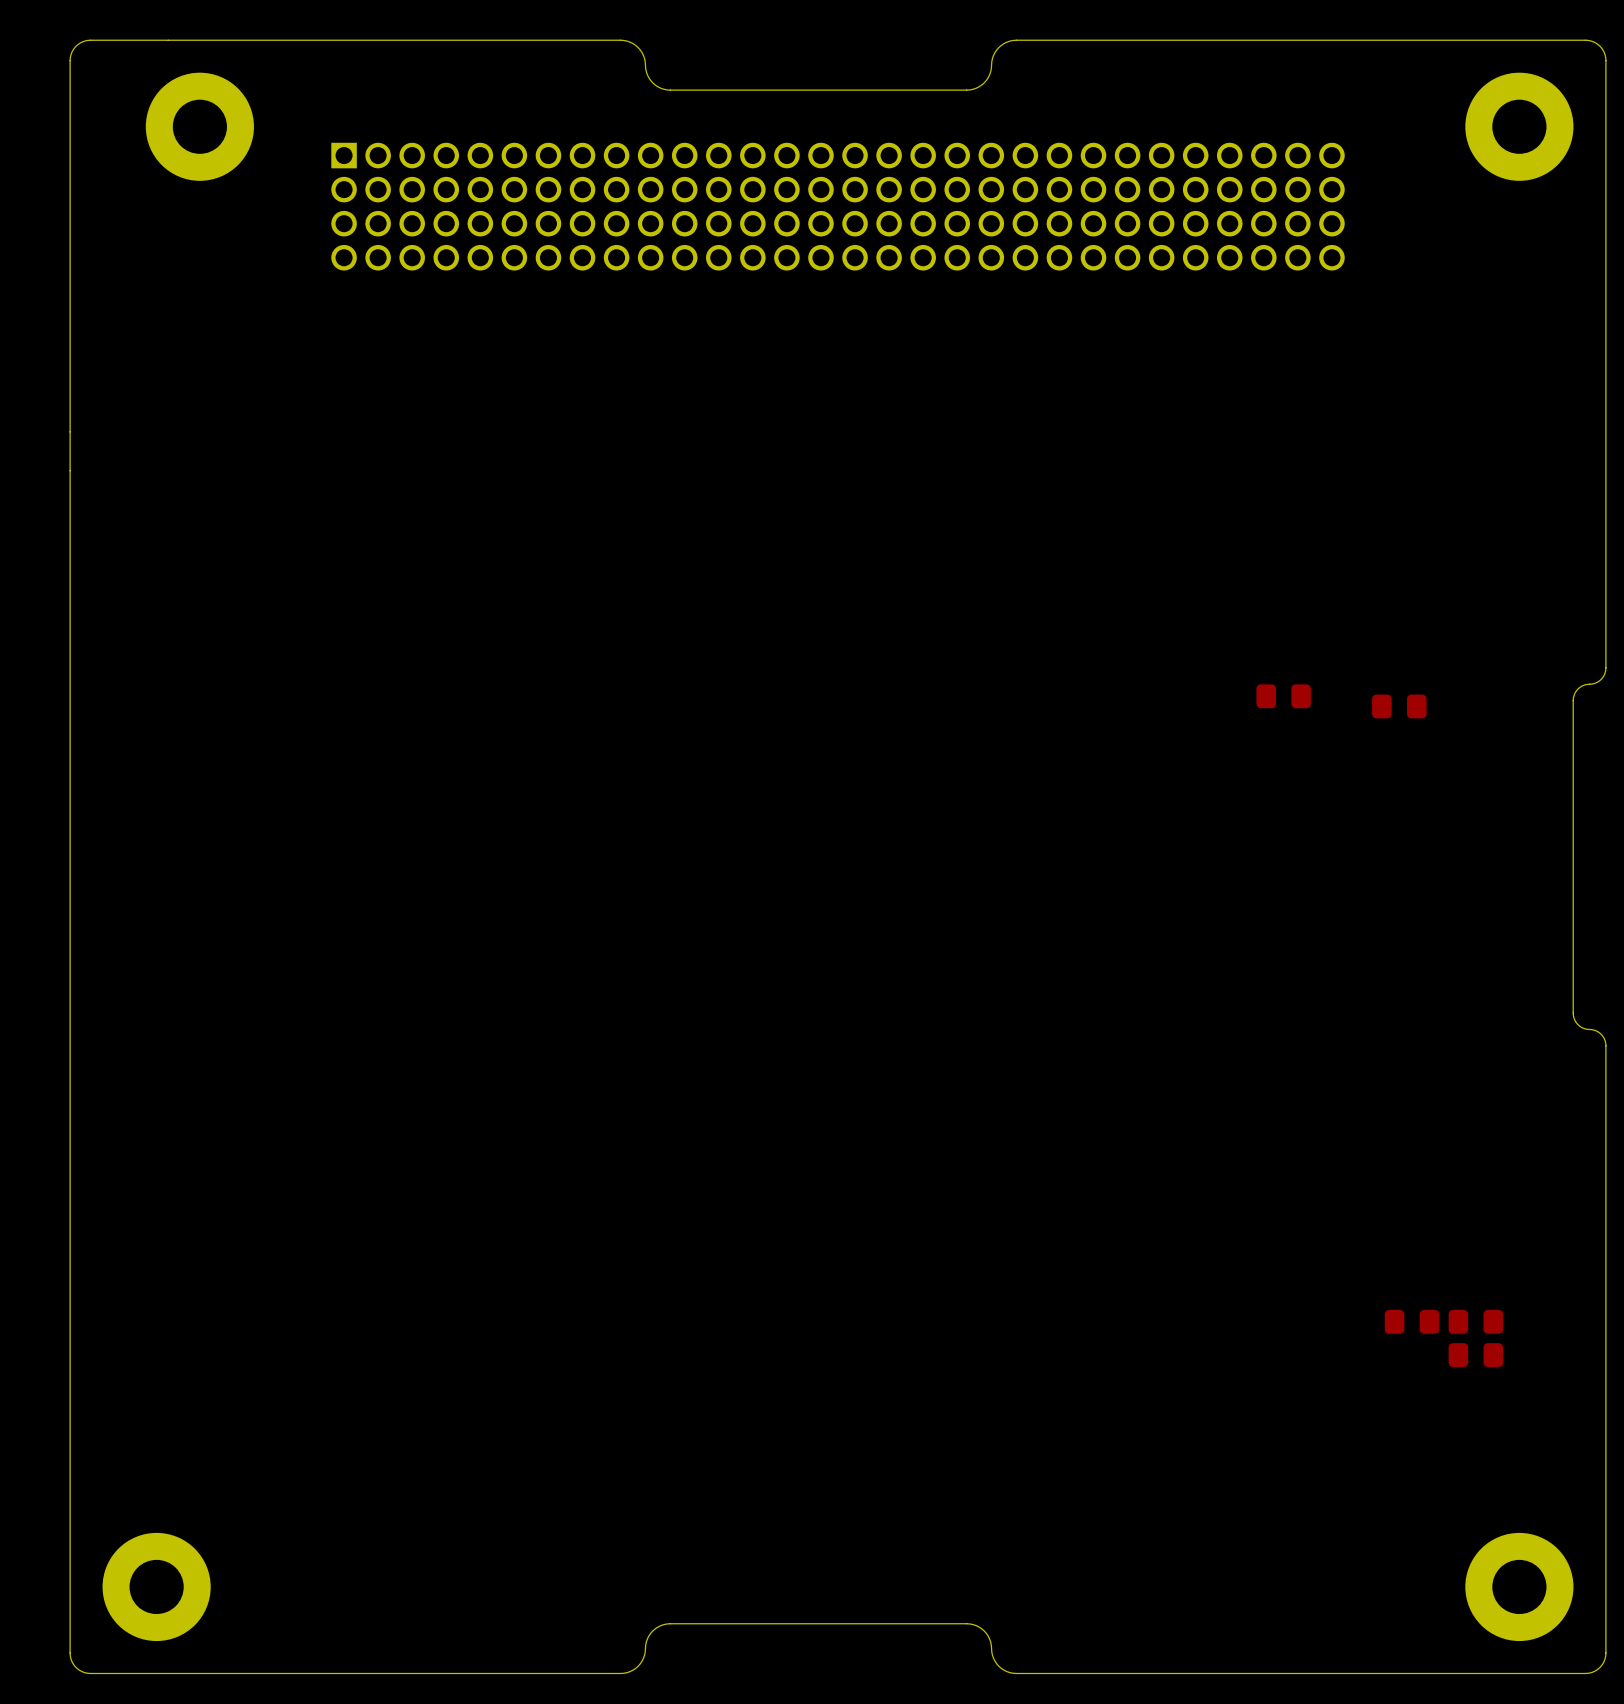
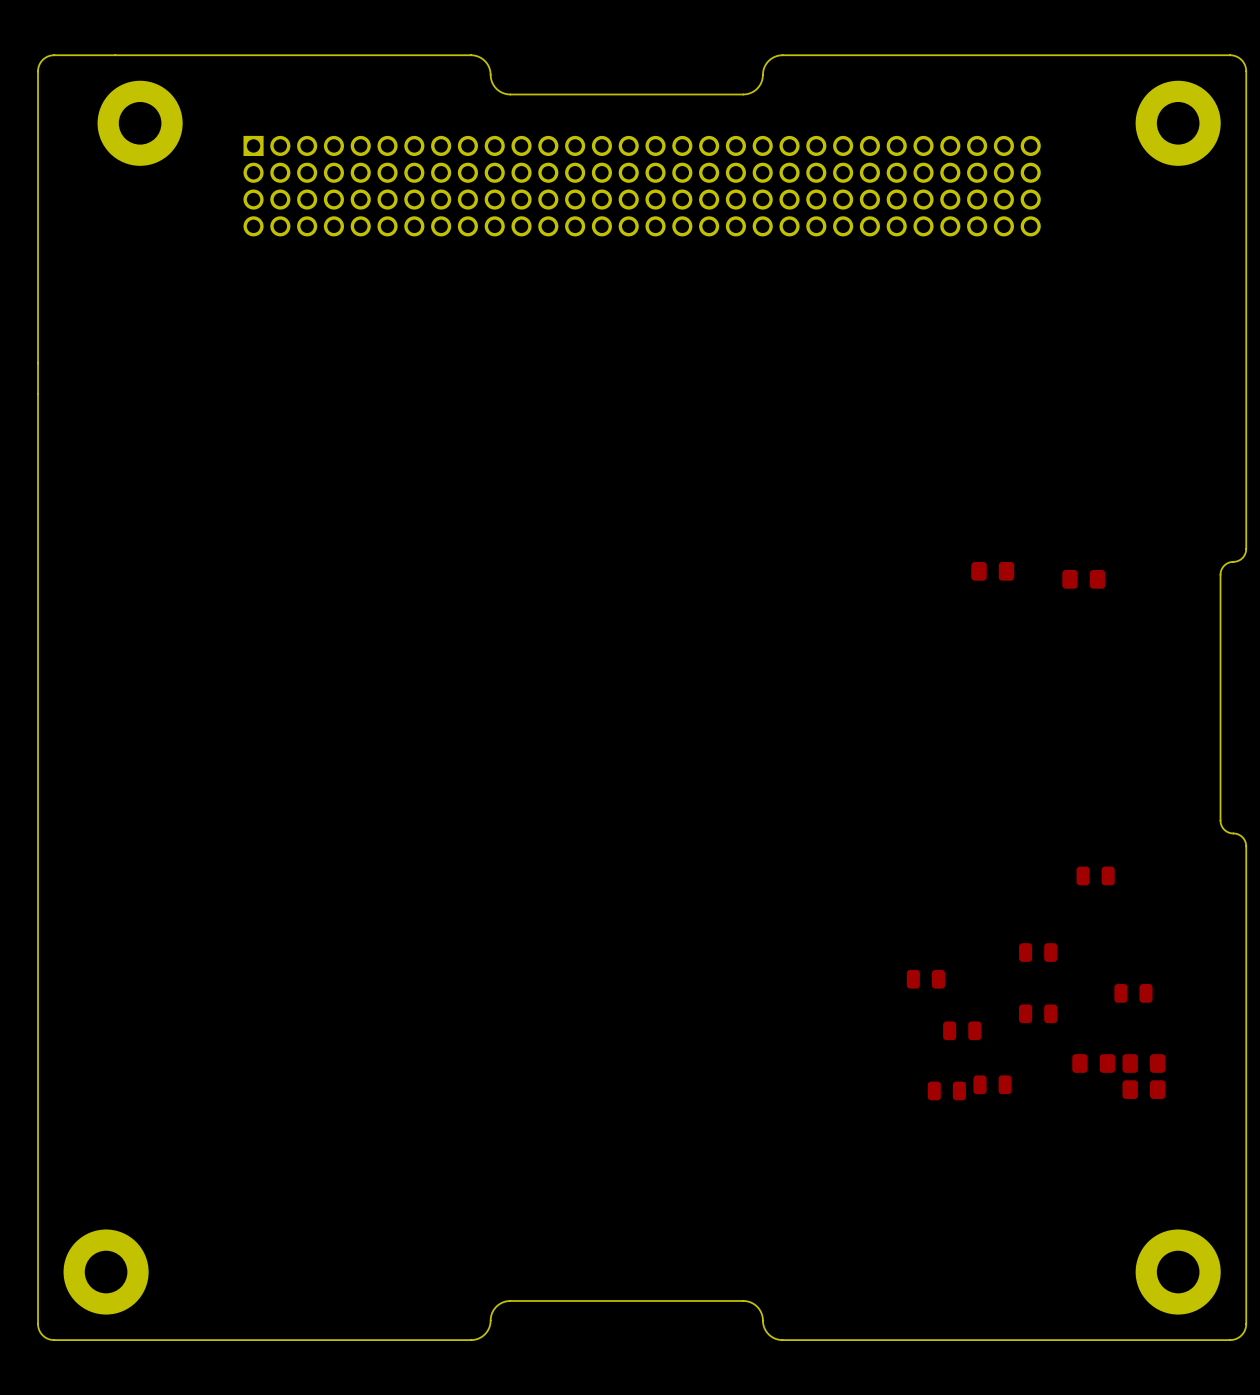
part: none -> (1095, 875)
part: none -> (1038, 952)
part: none -> (925, 979)
part: none -> (1133, 993)
part: none -> (1038, 1013)
part: none -> (962, 1030)
part: none -> (992, 1084)
part: none -> (946, 1090)

